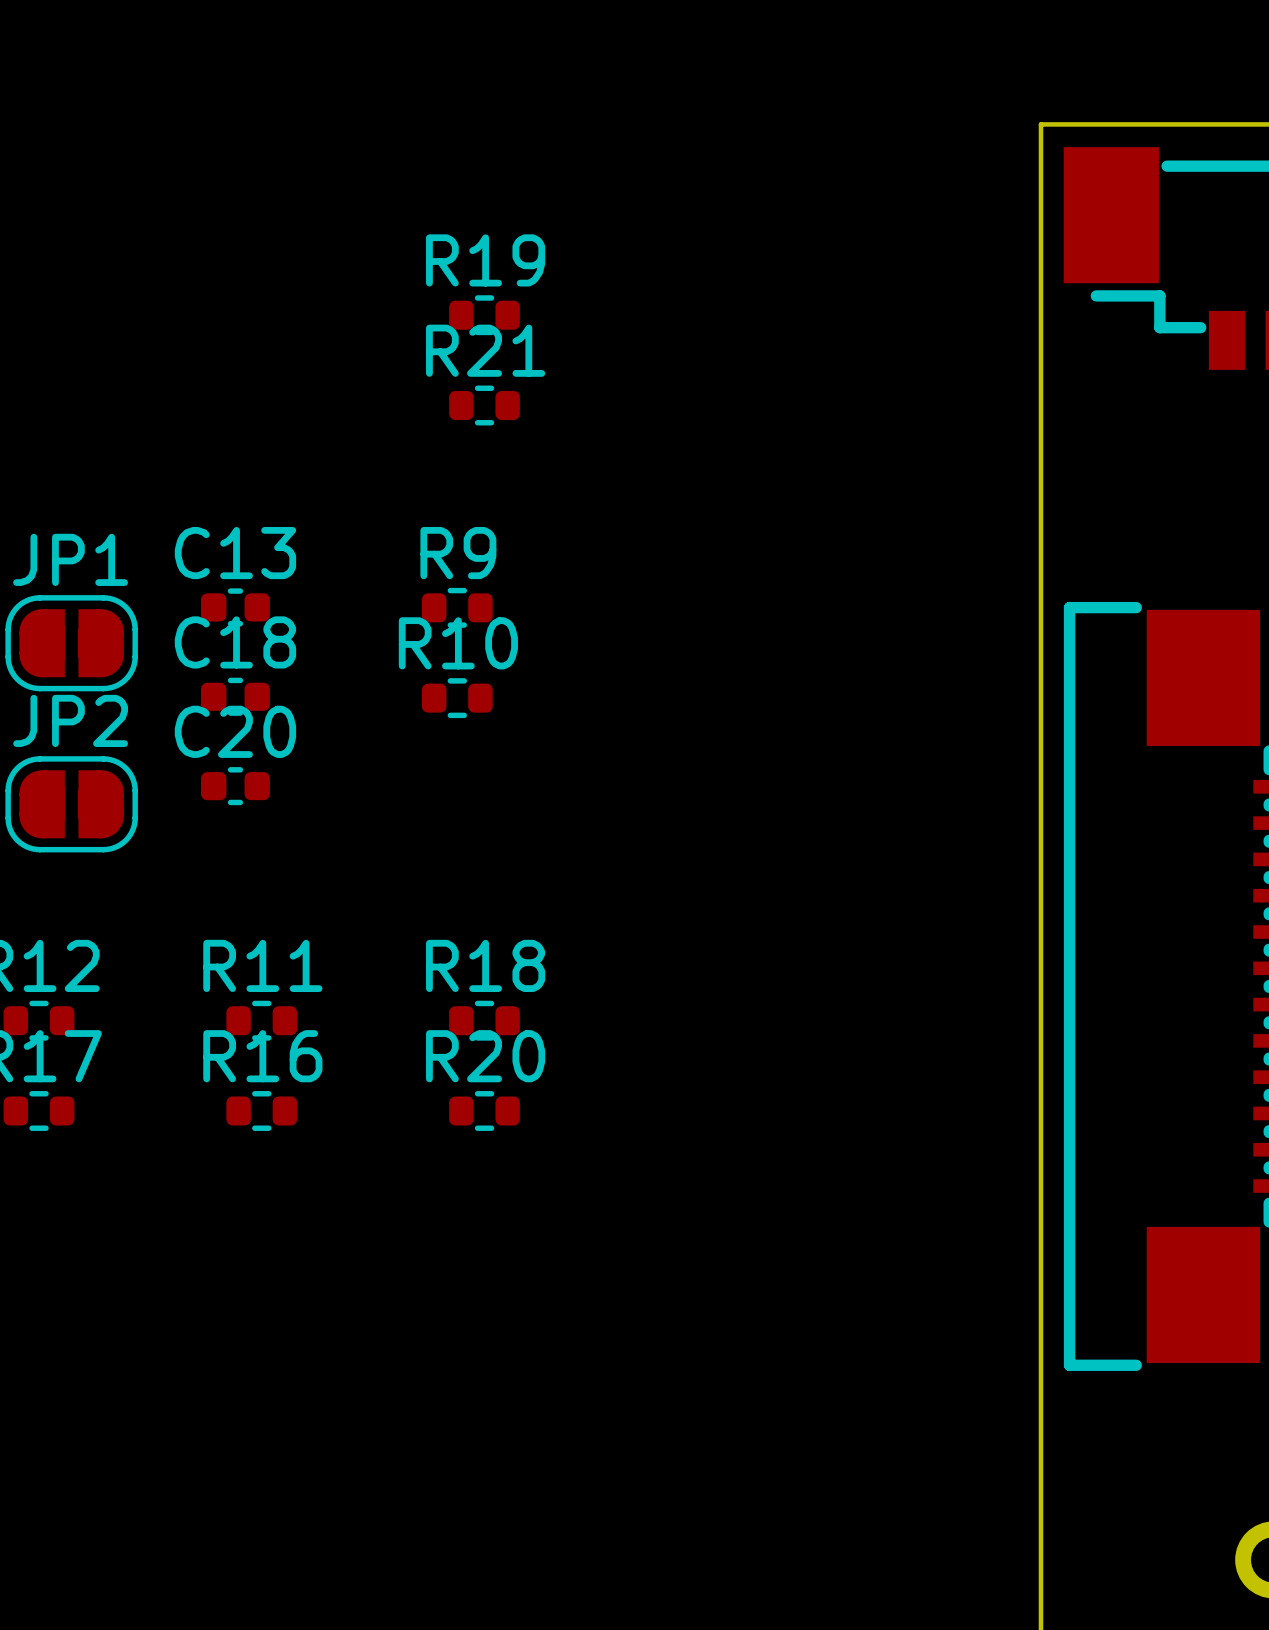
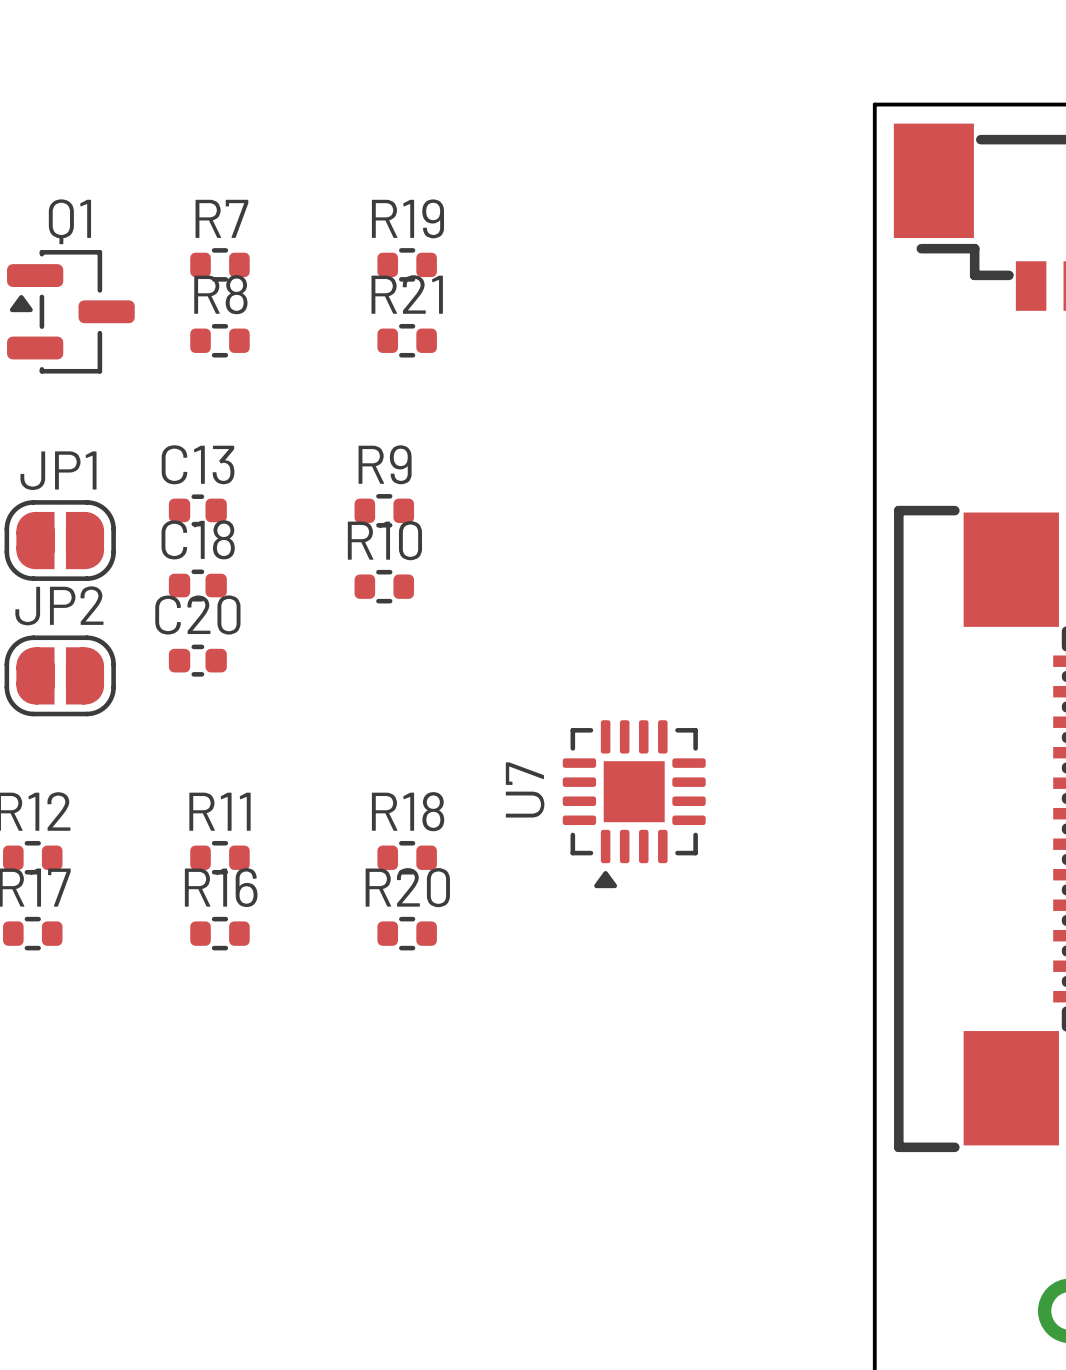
R7: none -> (219, 264)
Q1: none -> (70, 311)
R8: none -> (219, 340)
U7: none -> (634, 804)

